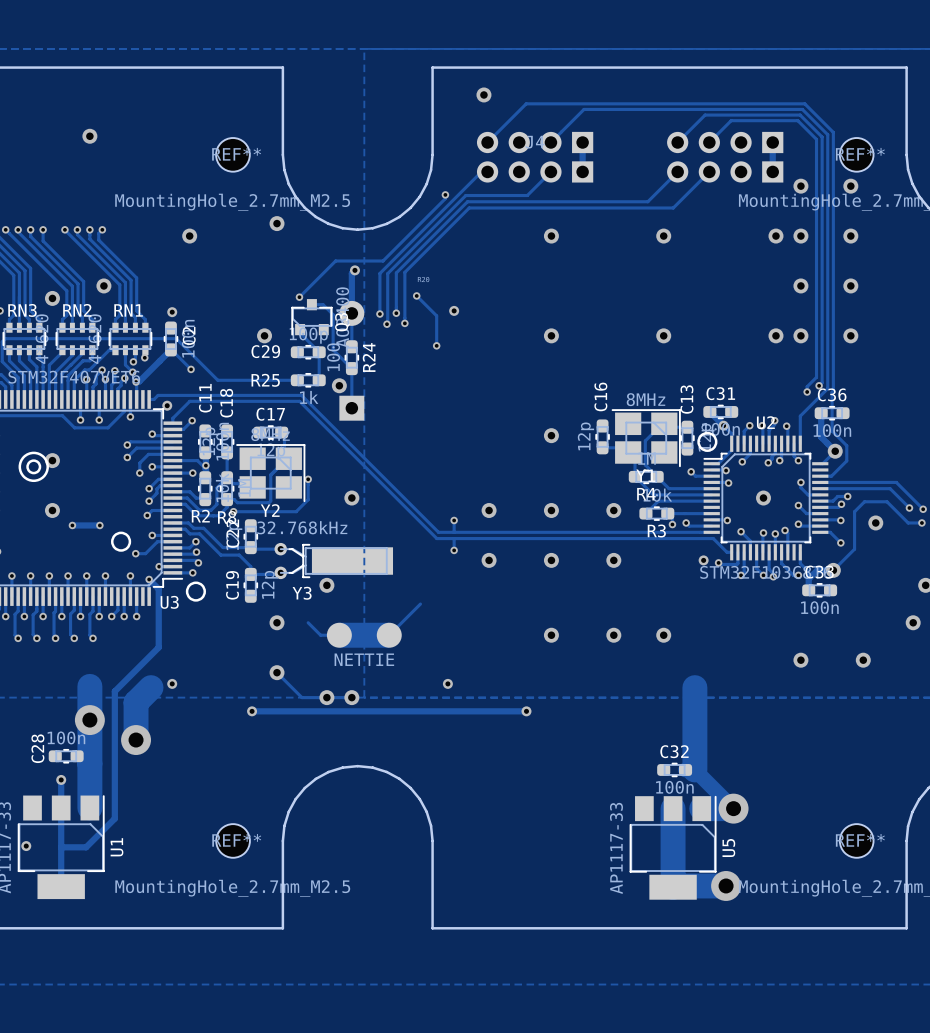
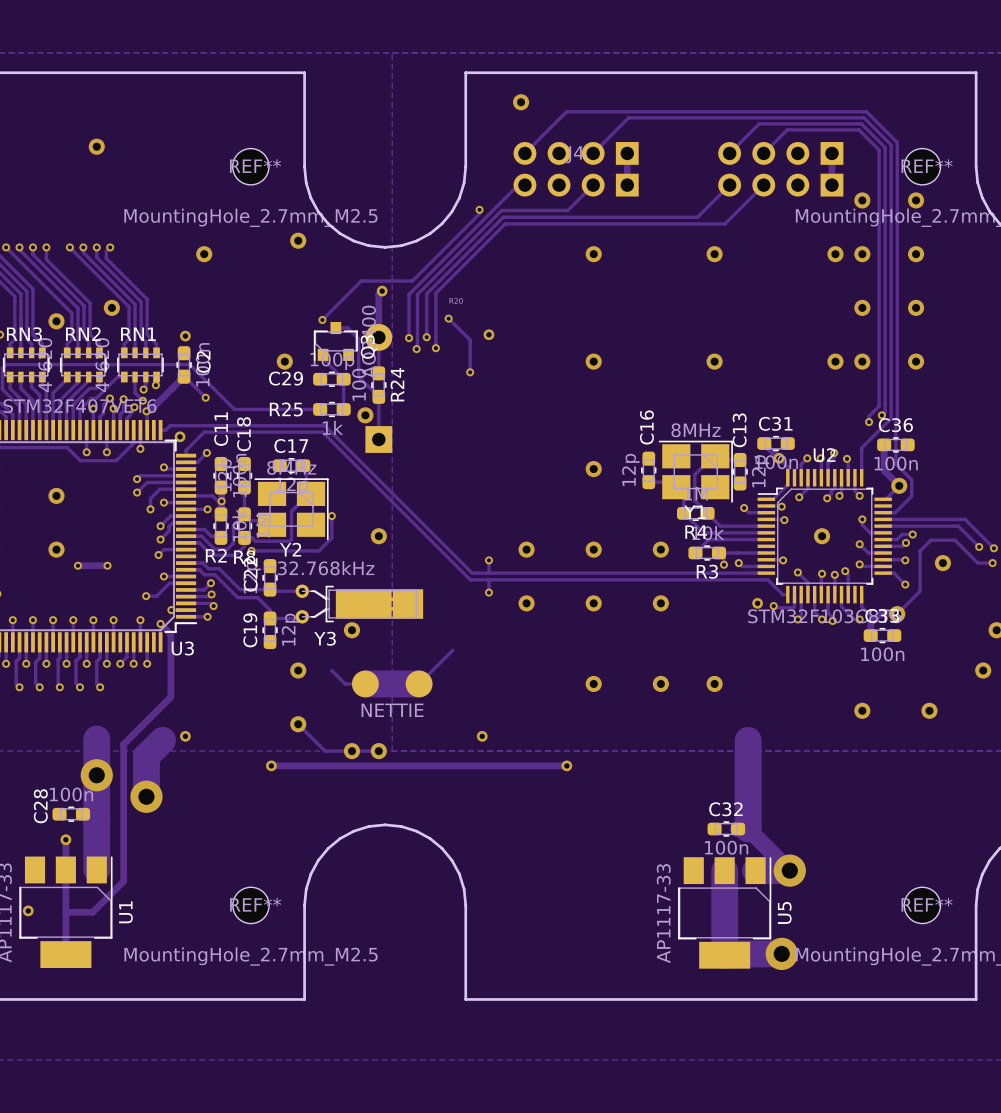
drawing: [697, 431, 718, 452] -> none
drawing: [18, 451, 49, 483] -> none
drawing: [111, 531, 132, 552] -> none
drawing: [185, 581, 206, 602] -> none

